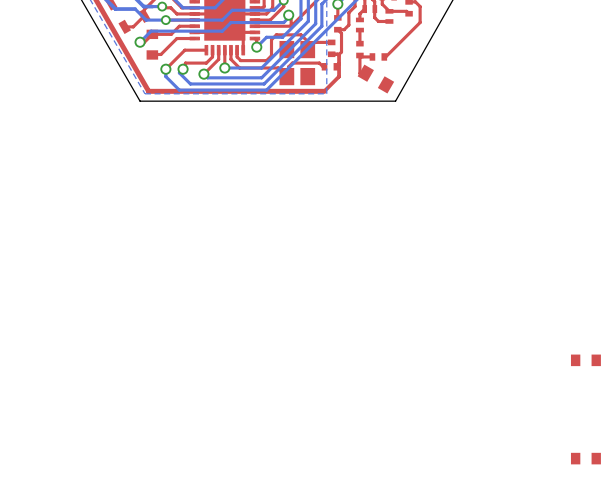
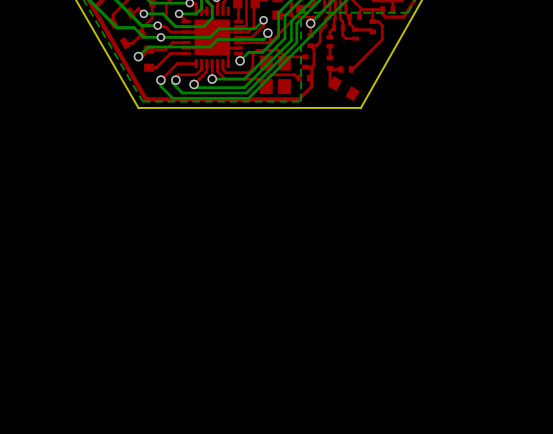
part: (585, 360) -> none
part: (585, 458) -> none

